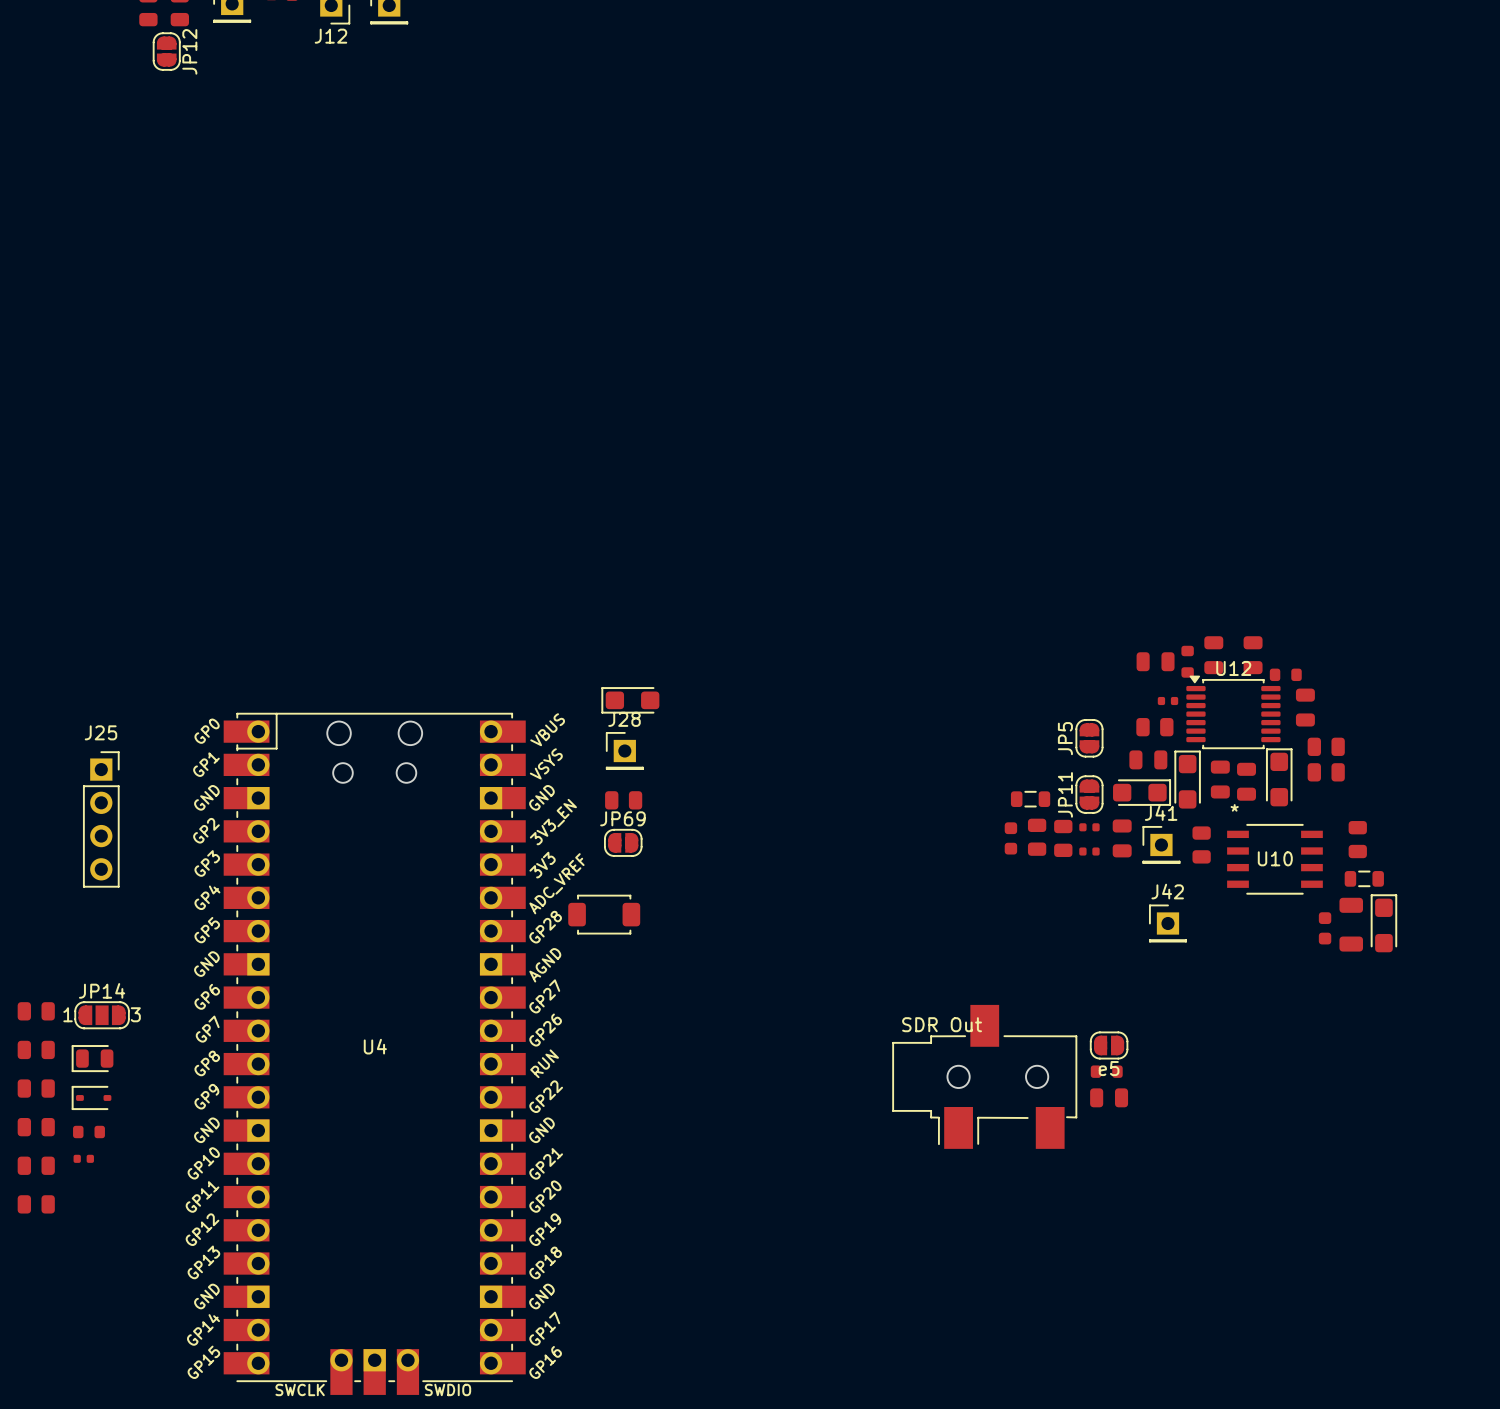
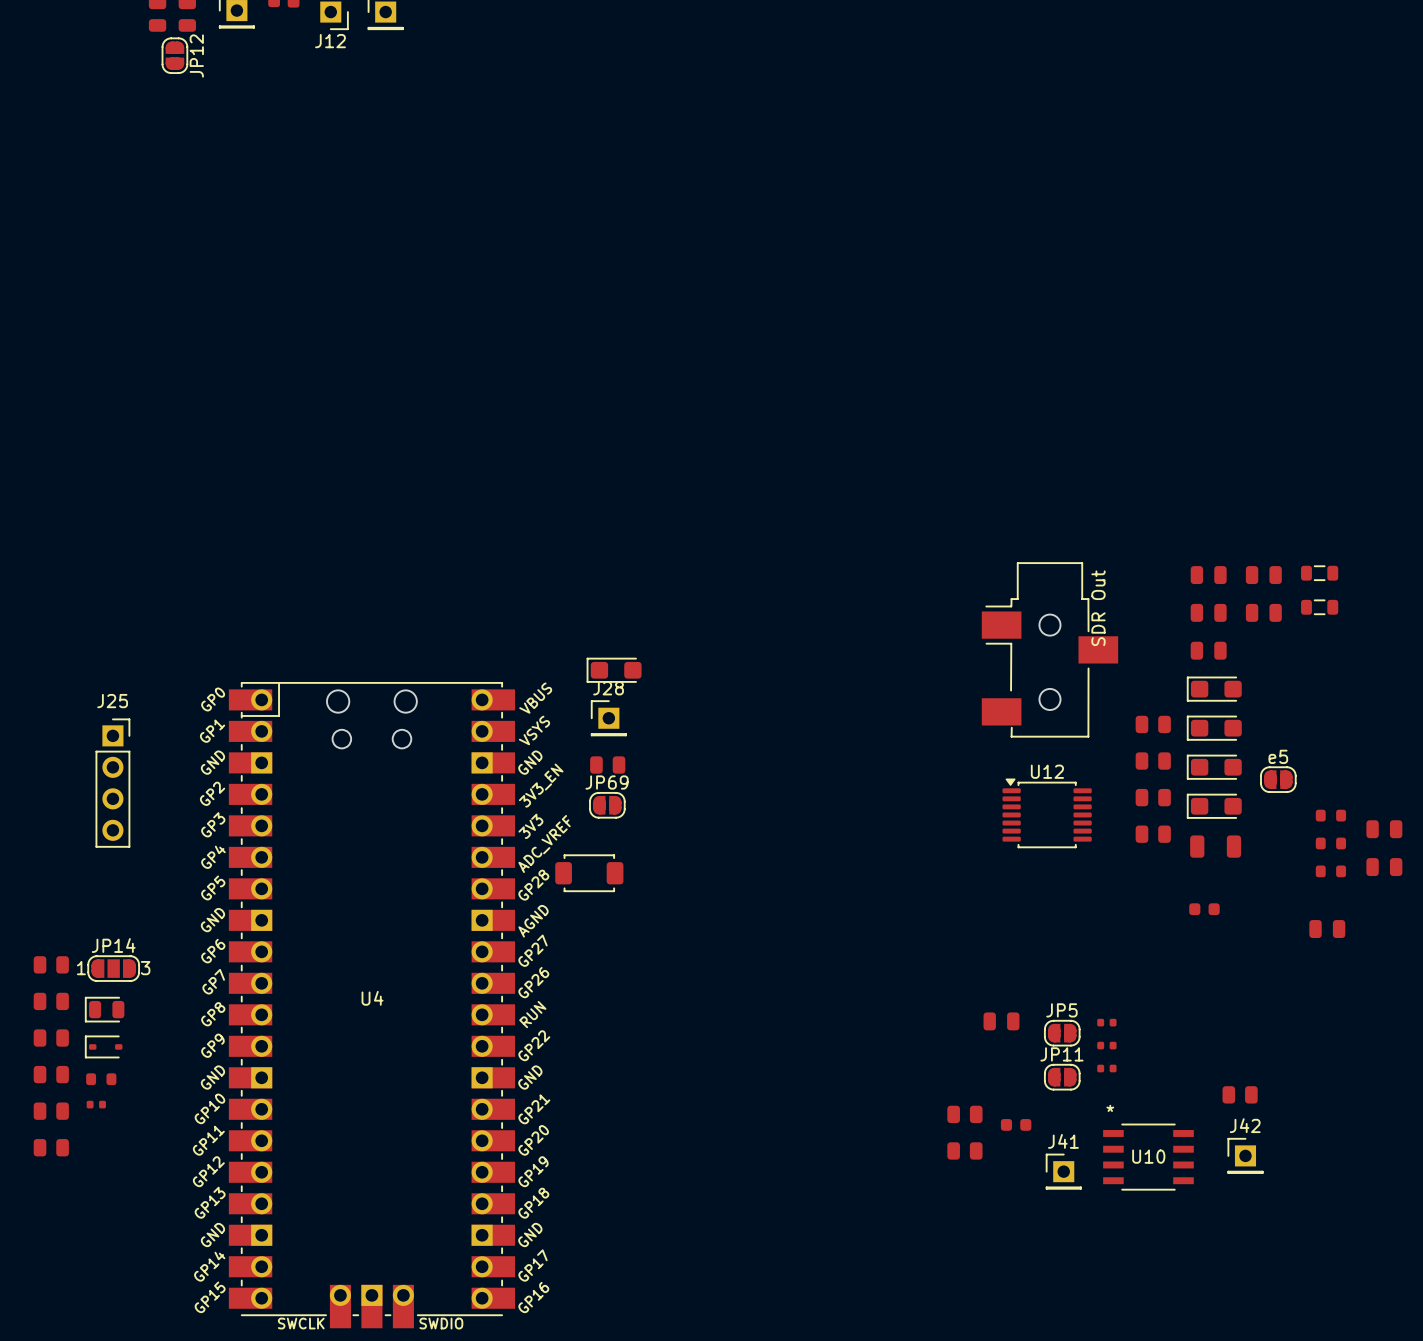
part: none -> (1319, 573)
part: none -> (1208, 575)
part: none -> (1263, 575)
part: none -> (1319, 607)
part: none -> (1208, 612)
part: none -> (1263, 612)
part: (1213, 655) -> none
part: (1253, 655) -> none
part: (1155, 661) -> none
part: (1187, 661) -> none
part: (1285, 674) -> none
part: none -> SDR Out (1049, 649)
part: none -> (1208, 650)
part: (1167, 701) -> none
part: (1305, 707) -> none
U12 position: (1233, 712) -> (1047, 813)
part: none -> (1214, 689)
part: (1154, 727) -> none
JP5 rotation: 0° (1089, 738) -> 90° clockwise (1062, 1033)
JP5 position: (1089, 738) -> (1062, 1033)
part: (1326, 746) -> none
part: none -> (1153, 724)
part: (1148, 759) -> none
part: none -> (1214, 728)
part: (1326, 772) -> none
part: (1279, 777) -> none
part: (1187, 779) -> none
part: (1220, 779) -> none
part: (1246, 781) -> none
part: (1142, 792) -> none
JP11 rotation: 0° (1089, 794) -> 90° clockwise (1062, 1077)
JP11 position: (1089, 794) -> (1062, 1077)
part: none -> (1153, 761)
part: (1030, 799) -> none
part: none -> (1214, 767)
part: (1089, 827) -> none
part: (1037, 837) -> none
part: (1010, 838) -> none
part: (1063, 838) -> none
part: (1122, 838) -> none
part: (1357, 839) -> none
part: none -> (1214, 806)
J41 position: (1161, 844) -> (1063, 1171)
part rotation: 0° (1201, 844) -> 90° clockwise (1153, 797)
part: (1089, 851) -> none
part: none -> (1330, 815)
U10 position: (1274, 859) -> (1148, 1157)
part: none -> (1384, 829)
part: none -> (1153, 834)
part: (1364, 878) -> none
part: none -> (1330, 843)
part footprint: [1370, 894, 1398, 953] -> [1315, 865, 1347, 878]
part: none -> (1384, 867)
J42 position: (1167, 923) -> (1245, 1155)
part rotation: 0° (1351, 924) -> 90° clockwise (1215, 846)
part position: (1351, 924) -> (1215, 846)
part rotation: 0° (1325, 928) -> 90° clockwise (1204, 909)
part position: (1325, 928) -> (1204, 909)
part: none -> (1327, 929)
e5 position: (1109, 1045) -> (1278, 779)
e5 name position: e5 (1109, 1068) -> e5 (1278, 756)
part: (1106, 1071) -> none
part: none -> (1106, 1022)
part: SDR Out (984, 1076) -> none
part: none -> (1106, 1045)
part position: (1109, 1097) -> (1001, 1021)
part: none -> (1106, 1068)
part: none -> (1240, 1094)
part: none -> (964, 1114)
part: none -> (1016, 1124)
part: none -> (964, 1150)

